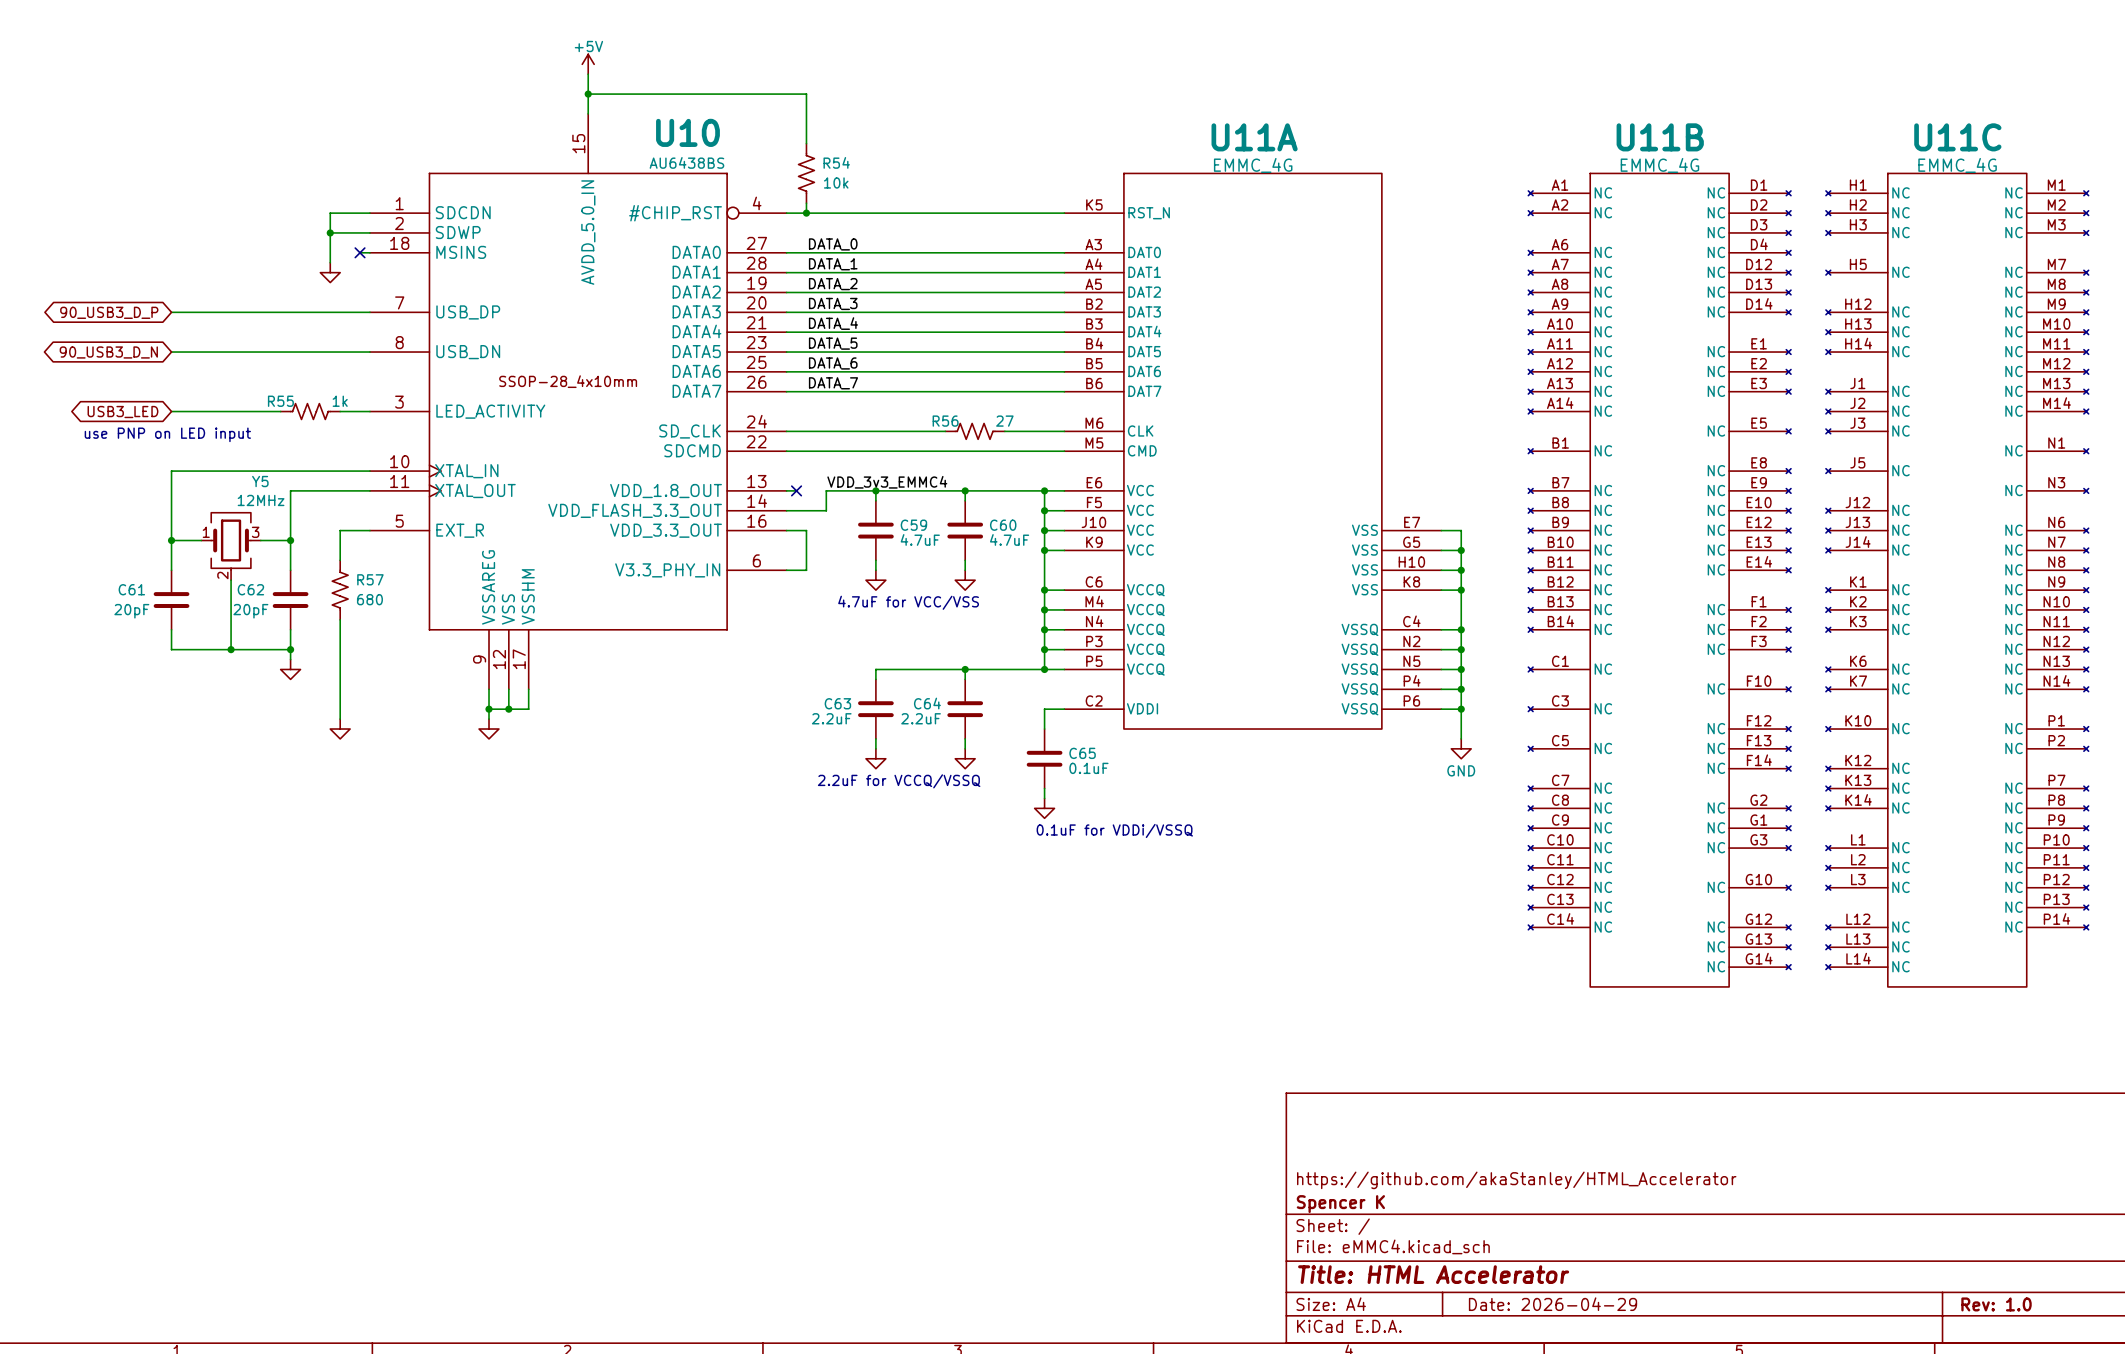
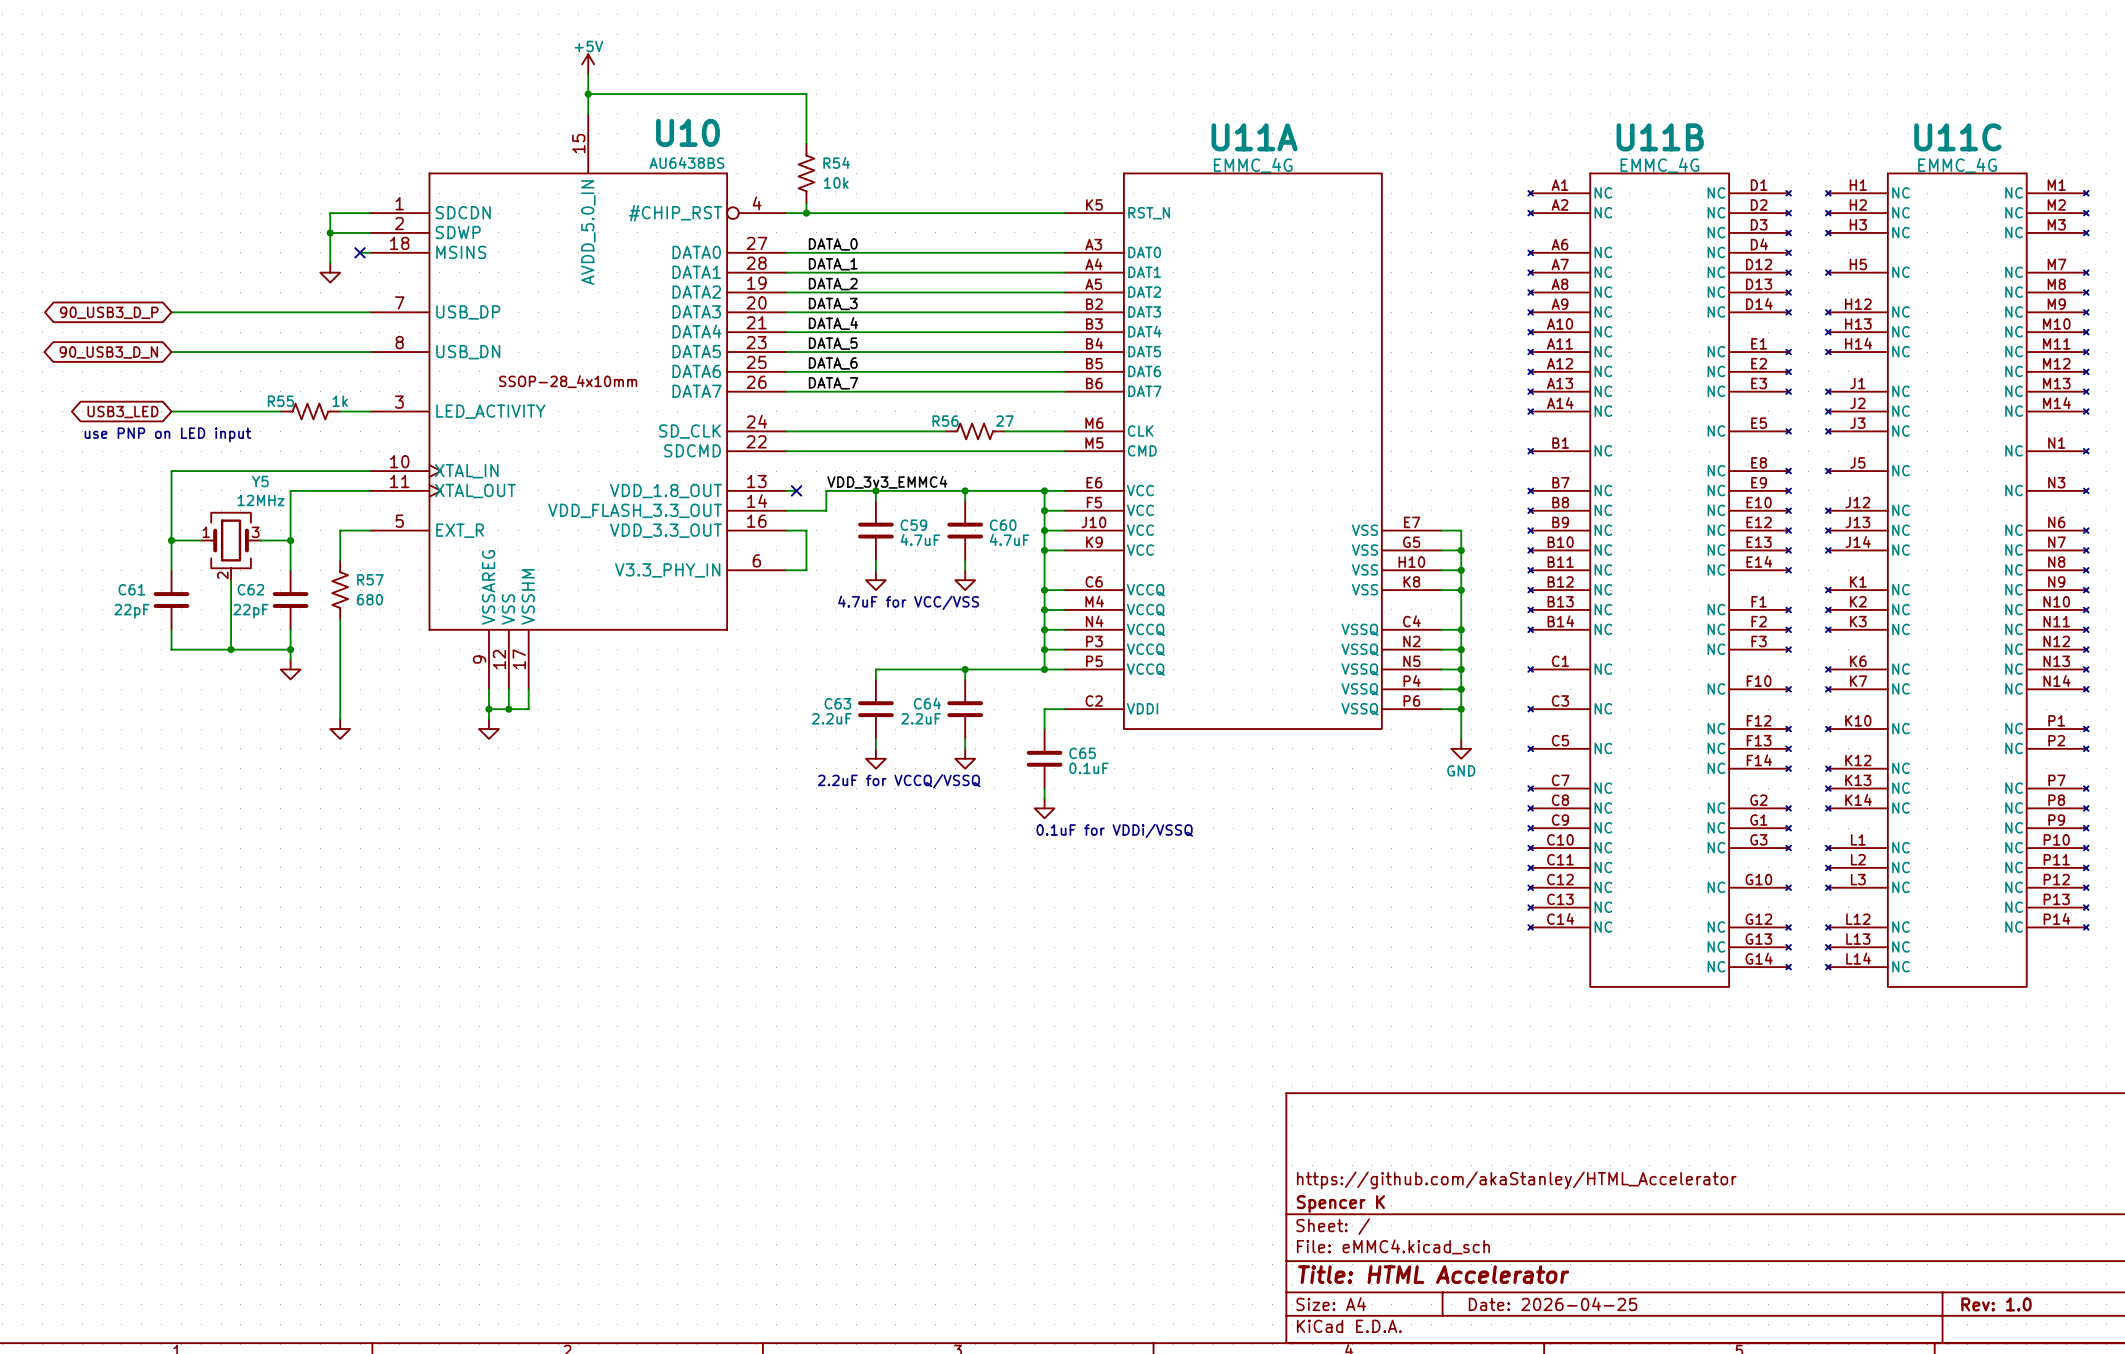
C61 value: 20pF (131, 611) -> 22pF (131, 611)
C62 value: 20pF (250, 611) -> 22pF (250, 611)
title block: Date: 2026-04-29 (1553, 1304) -> Date: 2026-04-25 (1553, 1304)

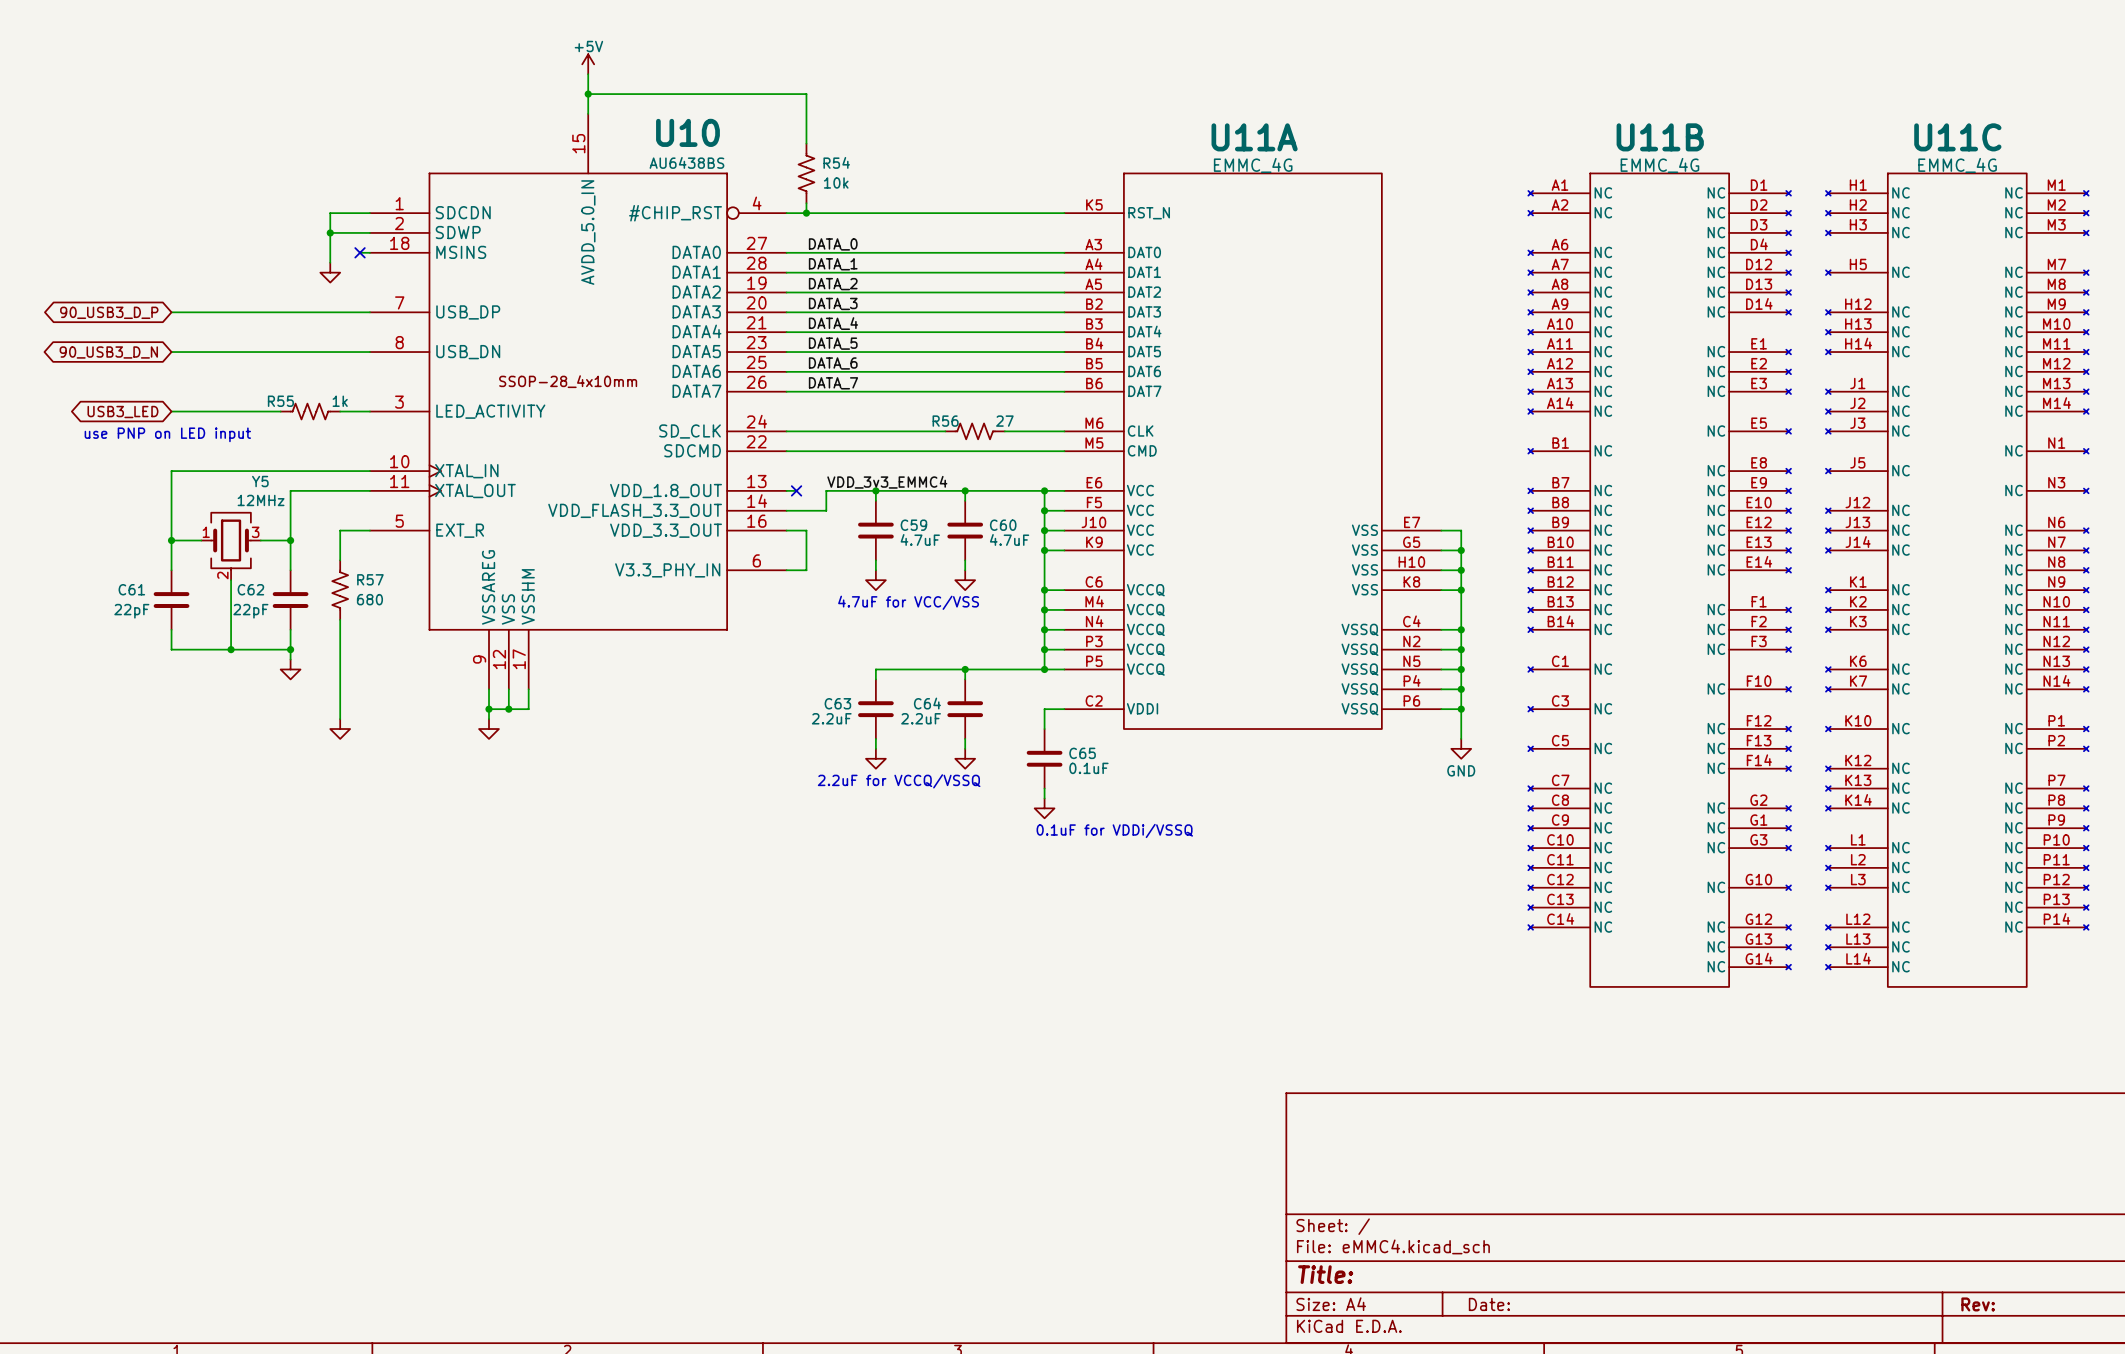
title block: https://github.com/akaStanley/HTML_Accelerator (1516, 1180) -> none
title block: Spencer K (1340, 1204) -> none
title block: Title: HTML Accelerator (1433, 1274) -> Title: (1325, 1274)
title block: Date: 2026-04-25 (1553, 1304) -> Date: (1489, 1304)
title block: Rev: 1.0 (1996, 1304) -> Rev: (1978, 1304)

